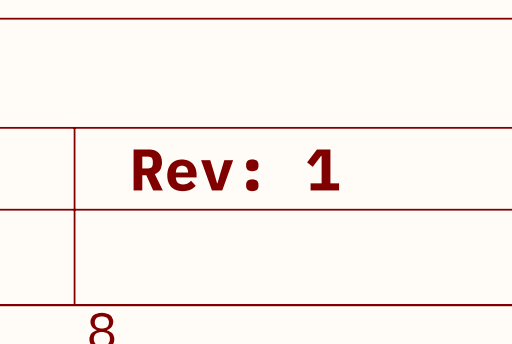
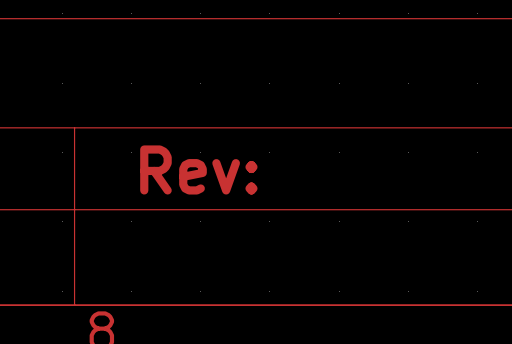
title block: Rev: 1 (236, 170) -> Rev: (198, 169)

